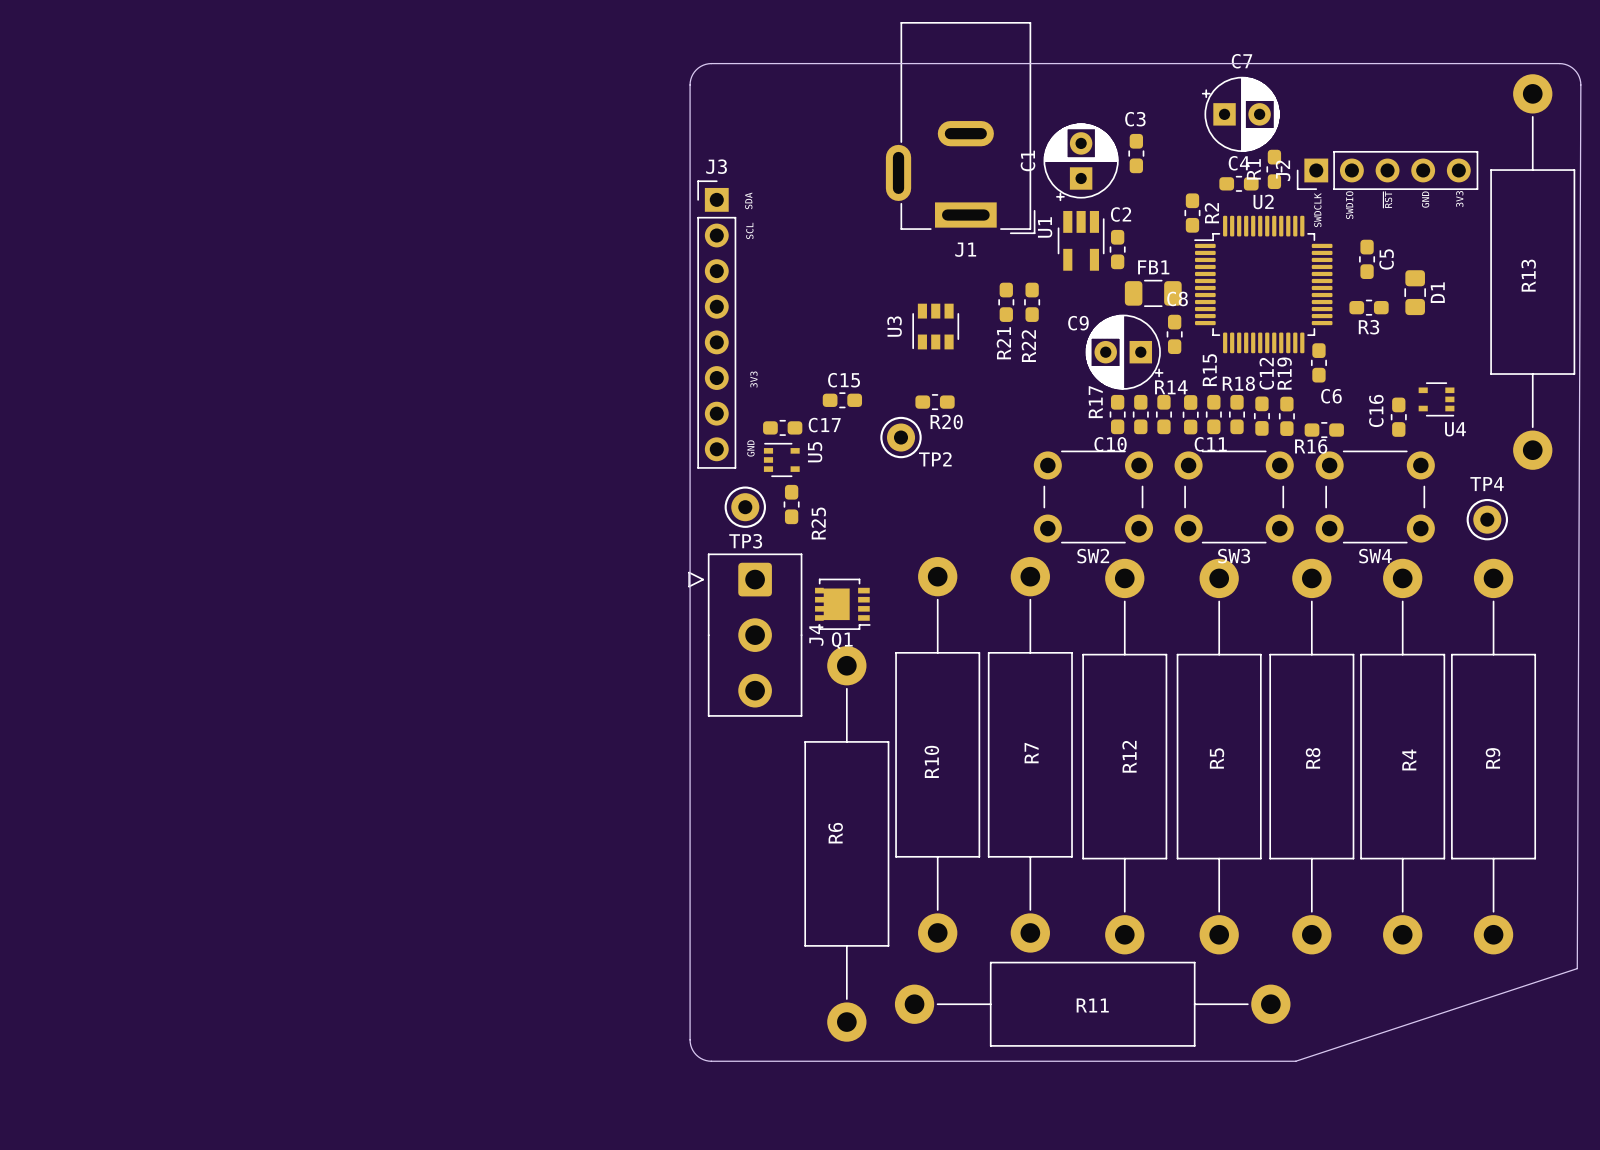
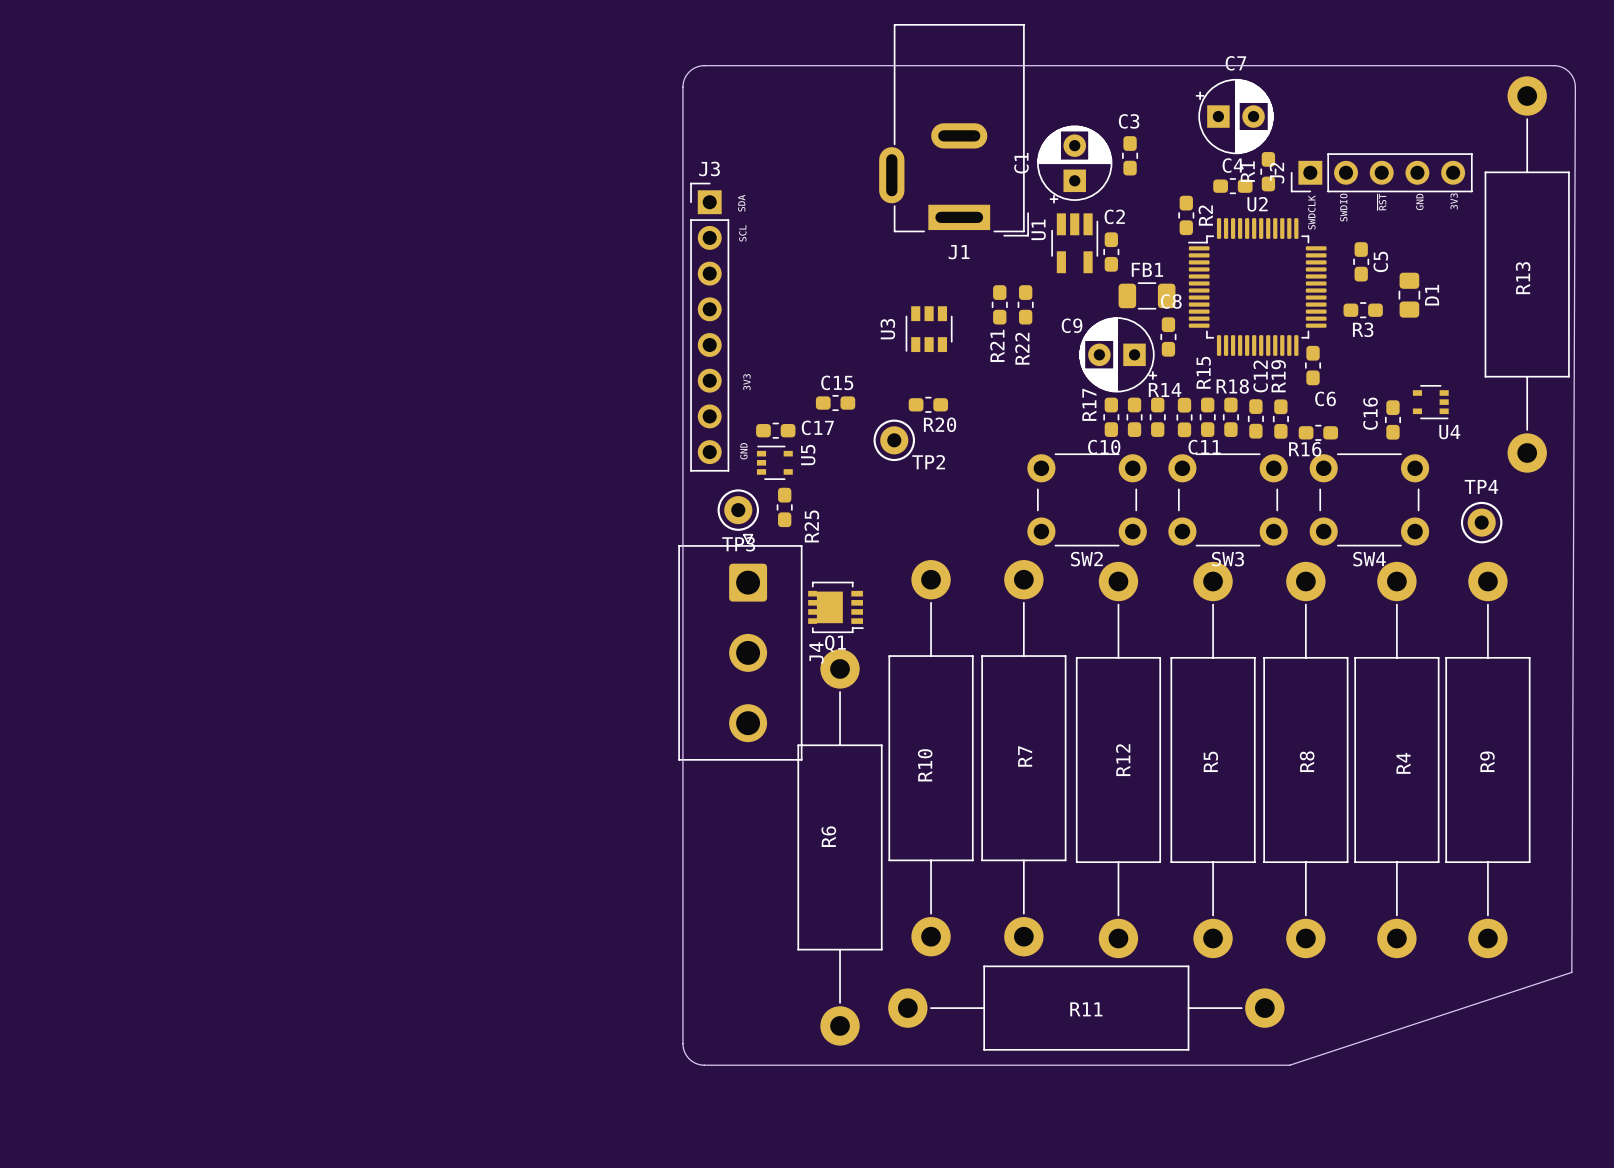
J4 footprint: [688, 553, 803, 717] -> [678, 533, 803, 761]

